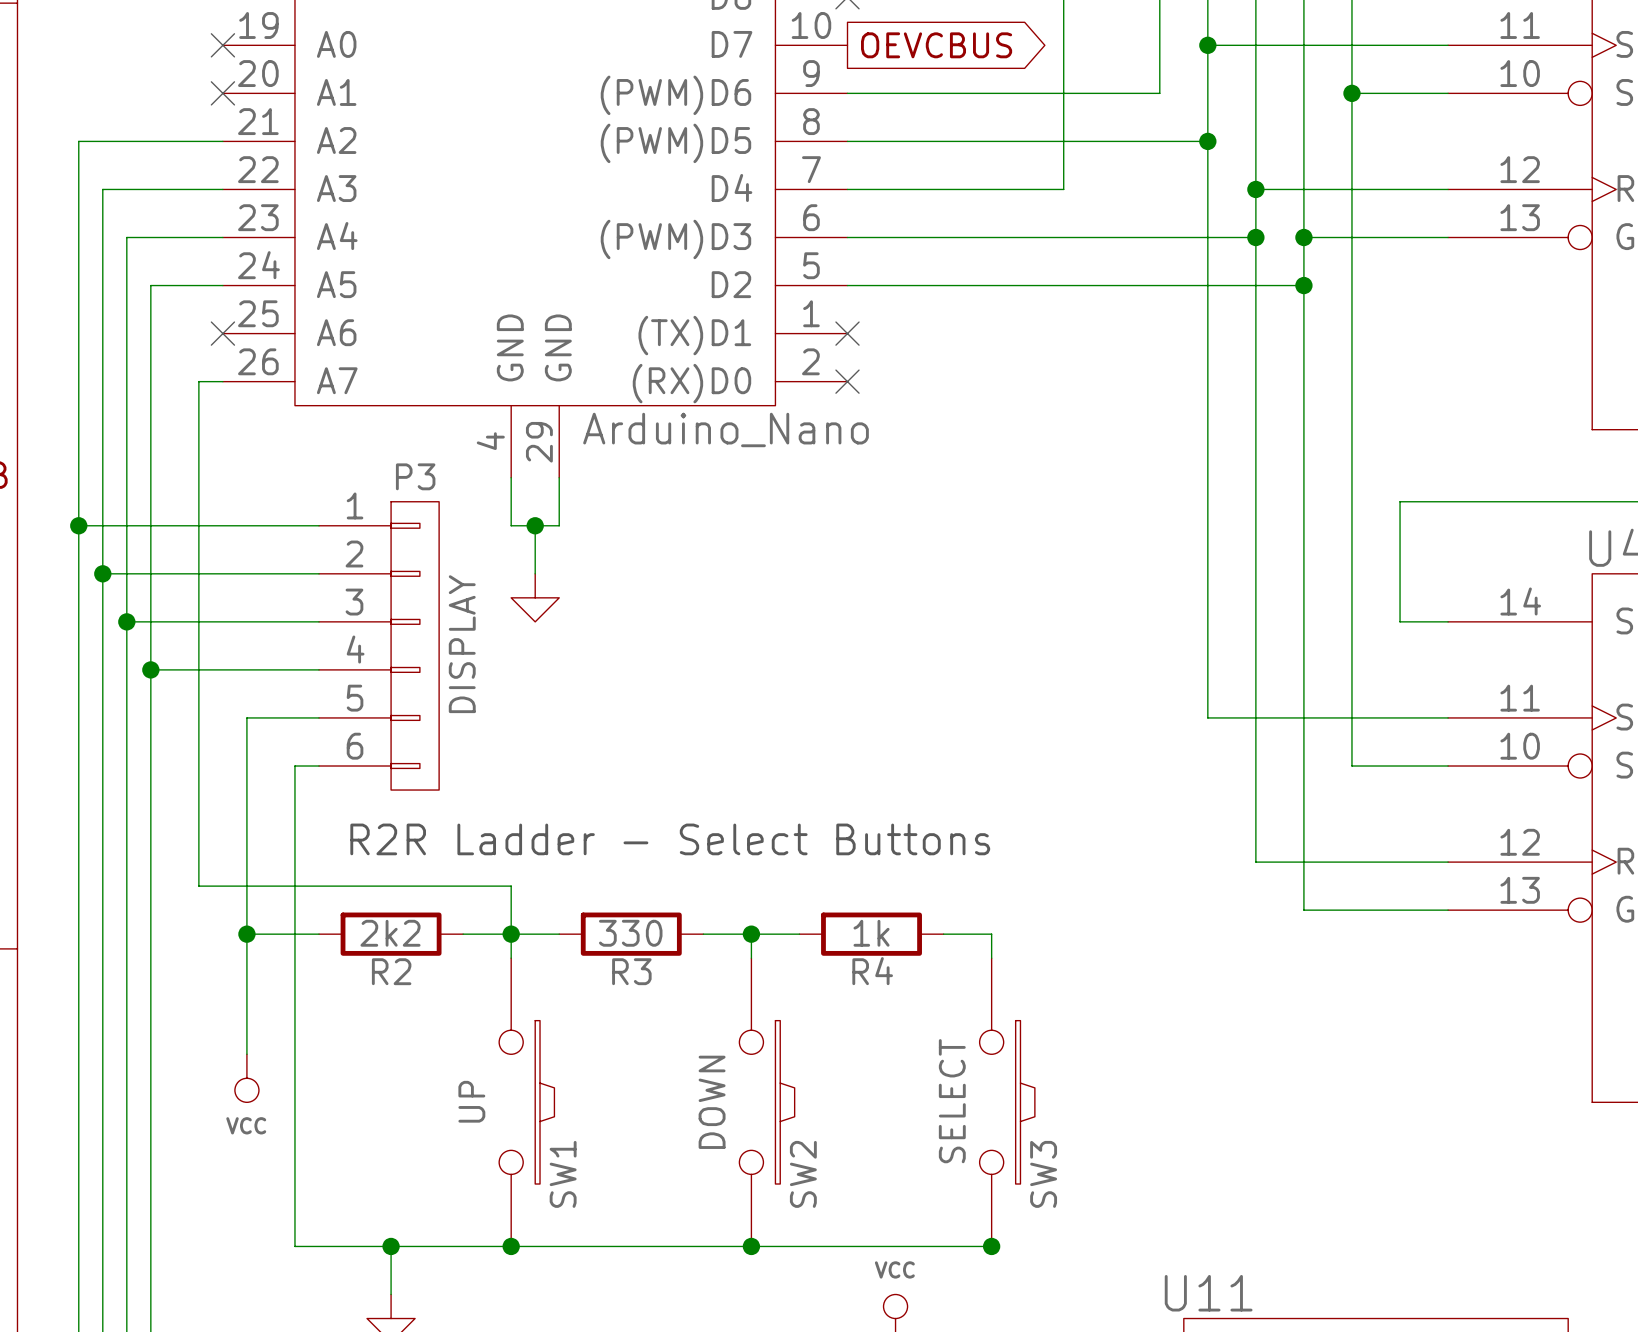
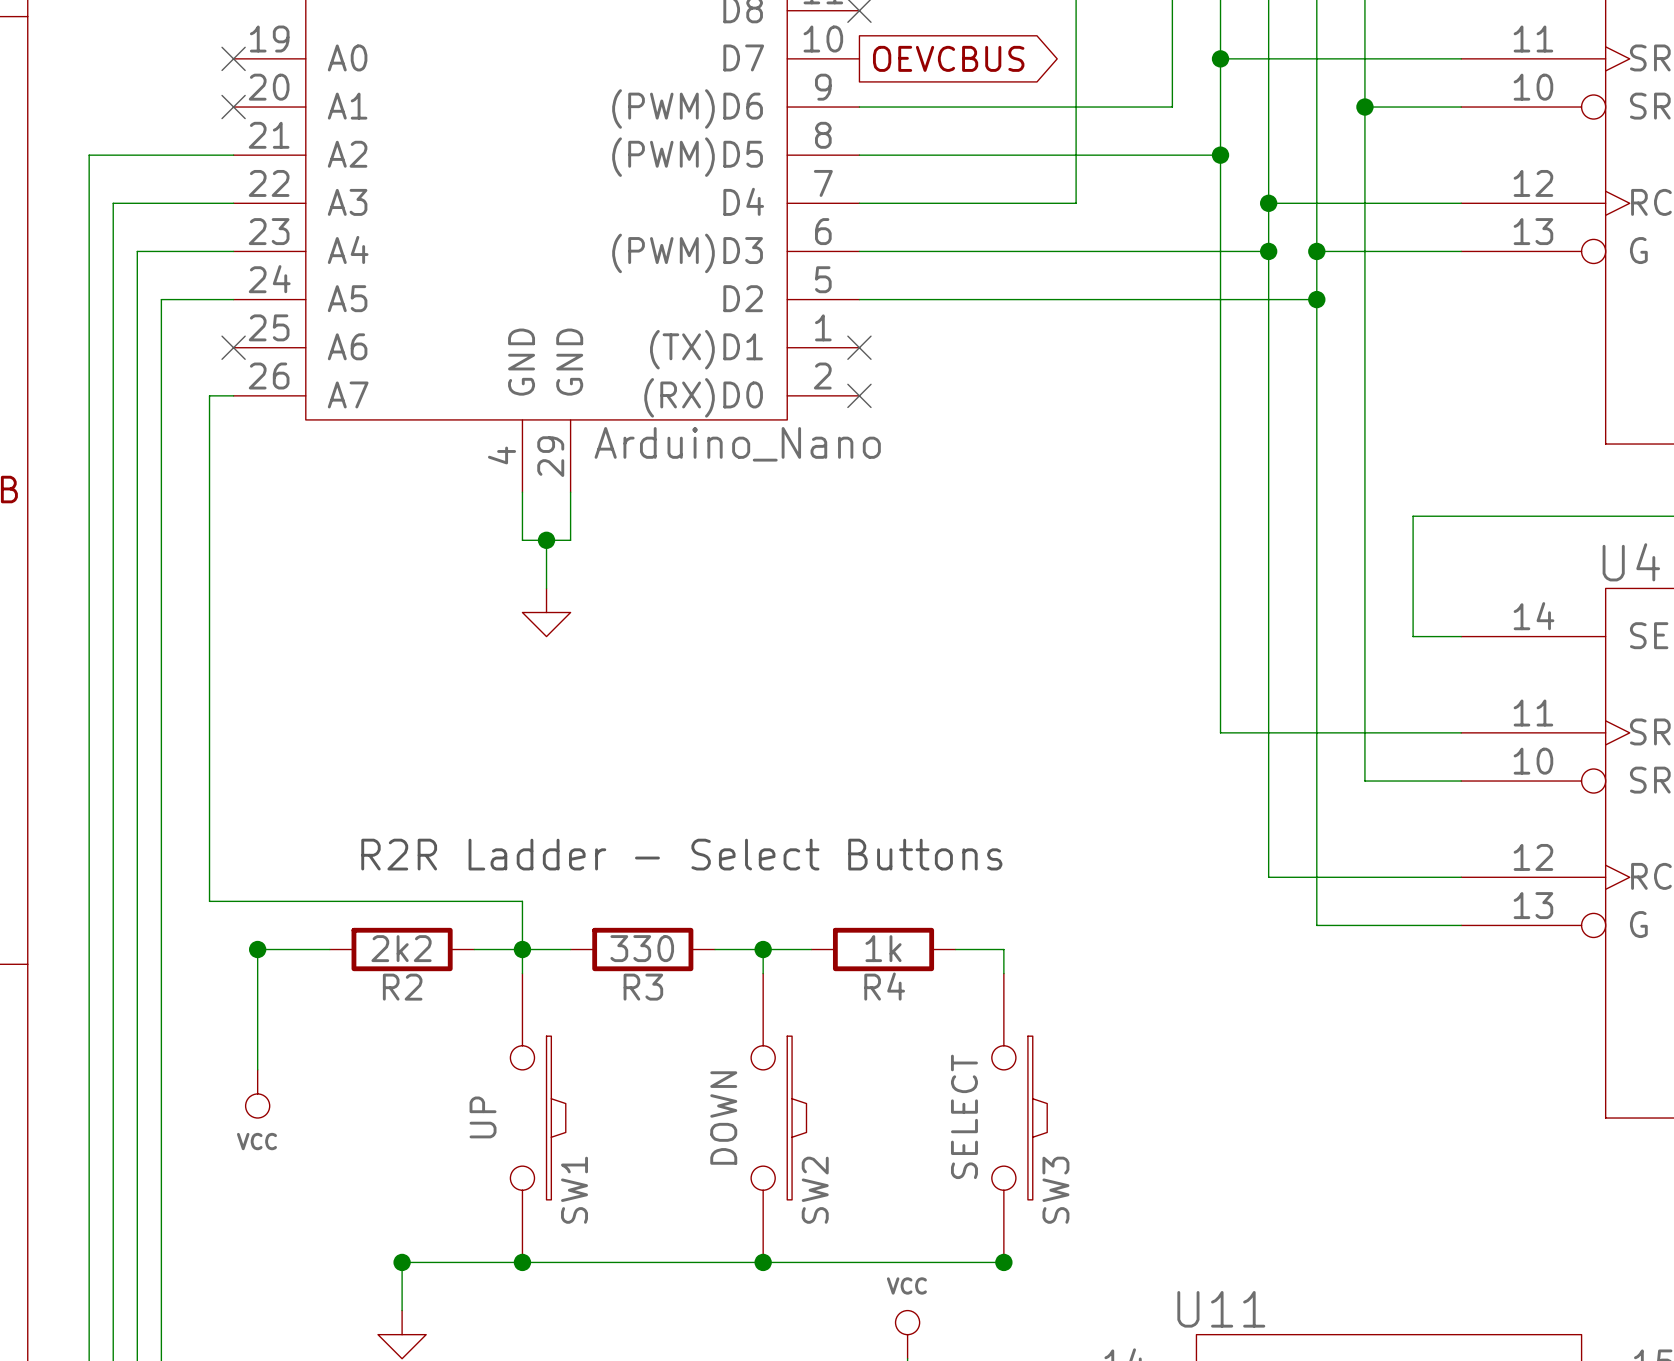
wire: (78, 525) (319, 525) -> none
junction: (78, 525) -> none
wire: (102, 573) (319, 573) -> none
junction: (102, 573) -> none
wire: (126, 621) (319, 621) -> none
junction: (126, 621) -> none
P3: DISPLAY (379, 645) -> none
wire: (150, 669) (319, 669) -> none
junction: (150, 669) -> none
wire: (319, 717) (246, 717) (246, 934) -> none
wire: (319, 766) (294, 766) (294, 1246) (391, 1246) -> none

